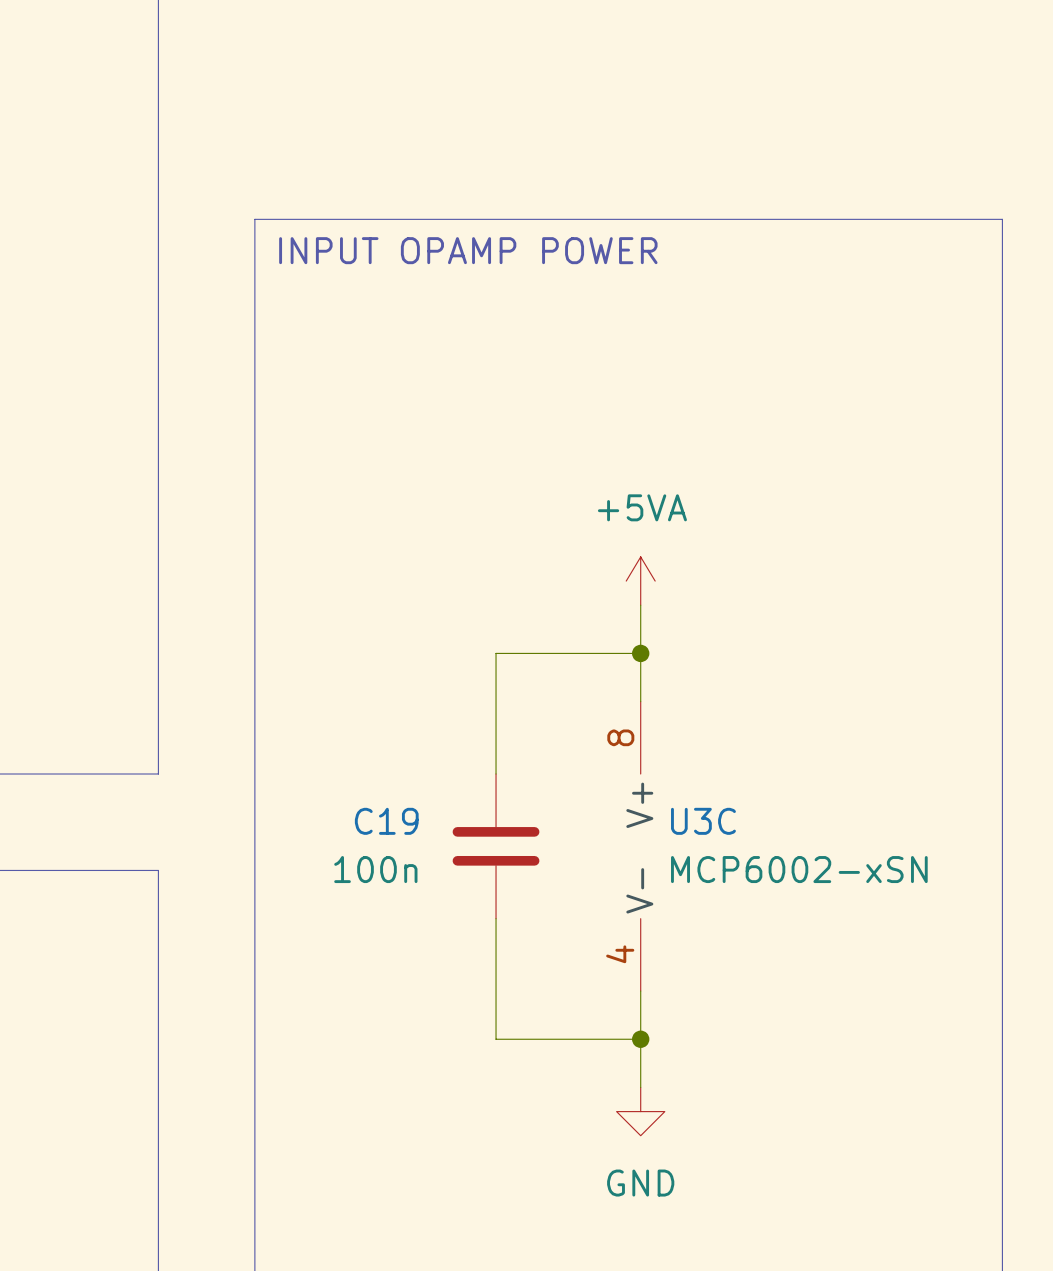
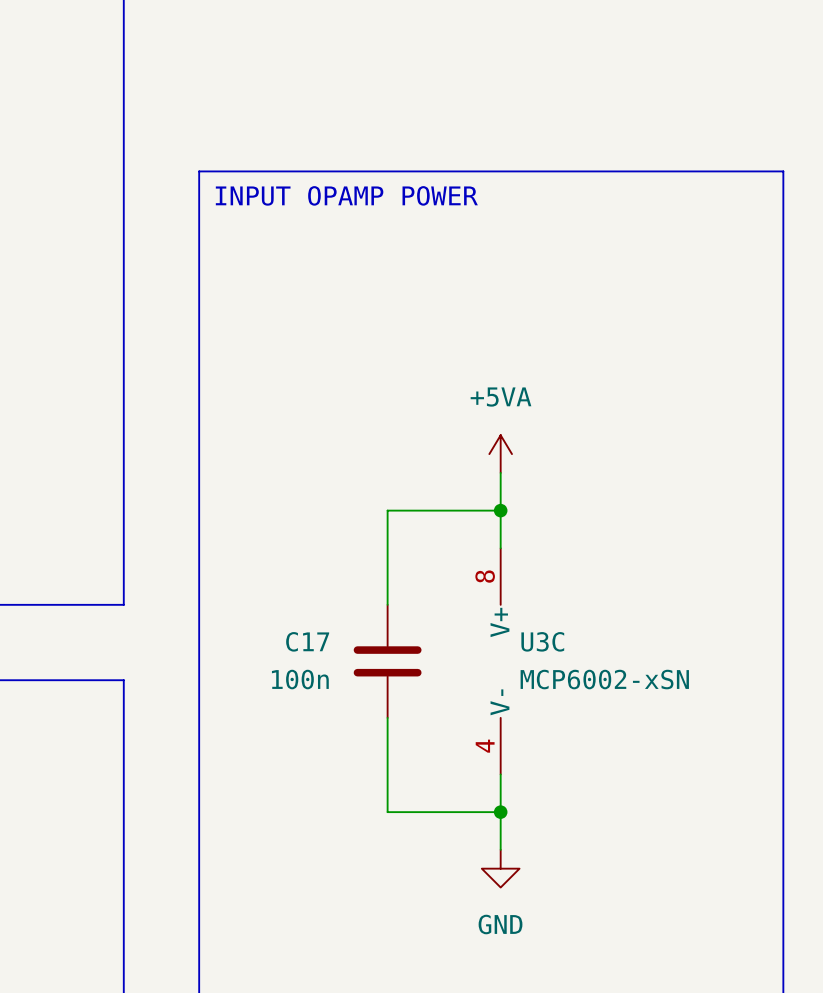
C19 name: C19 (386, 821) -> C17 (307, 641)

